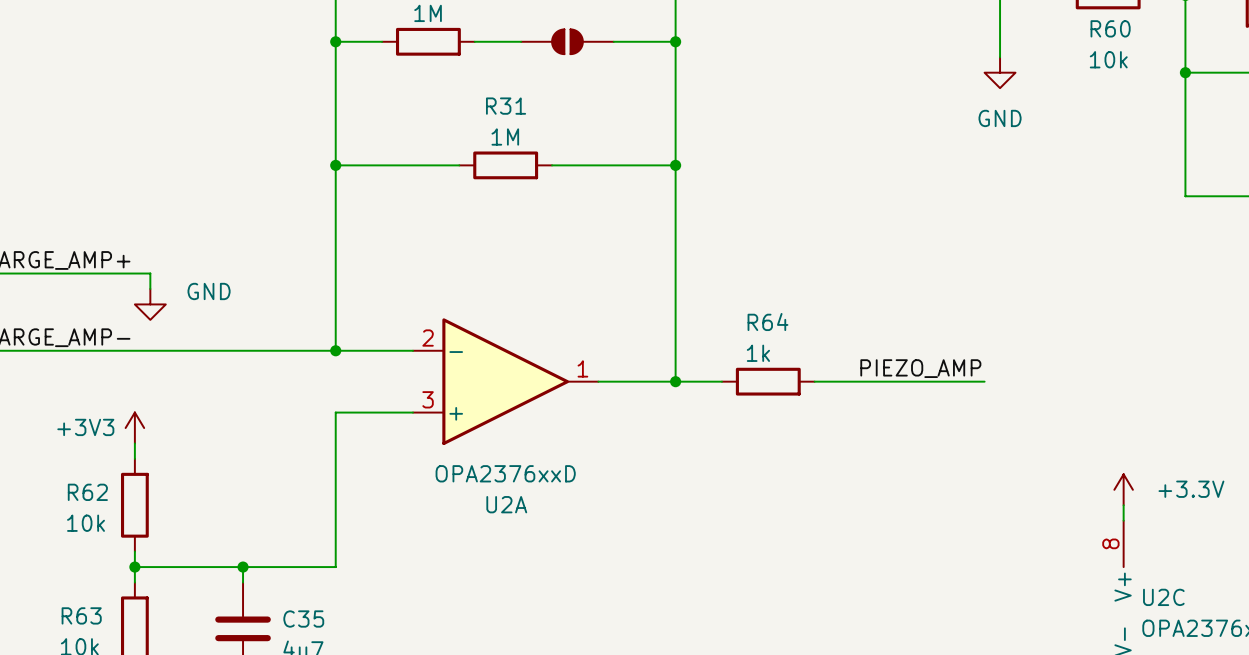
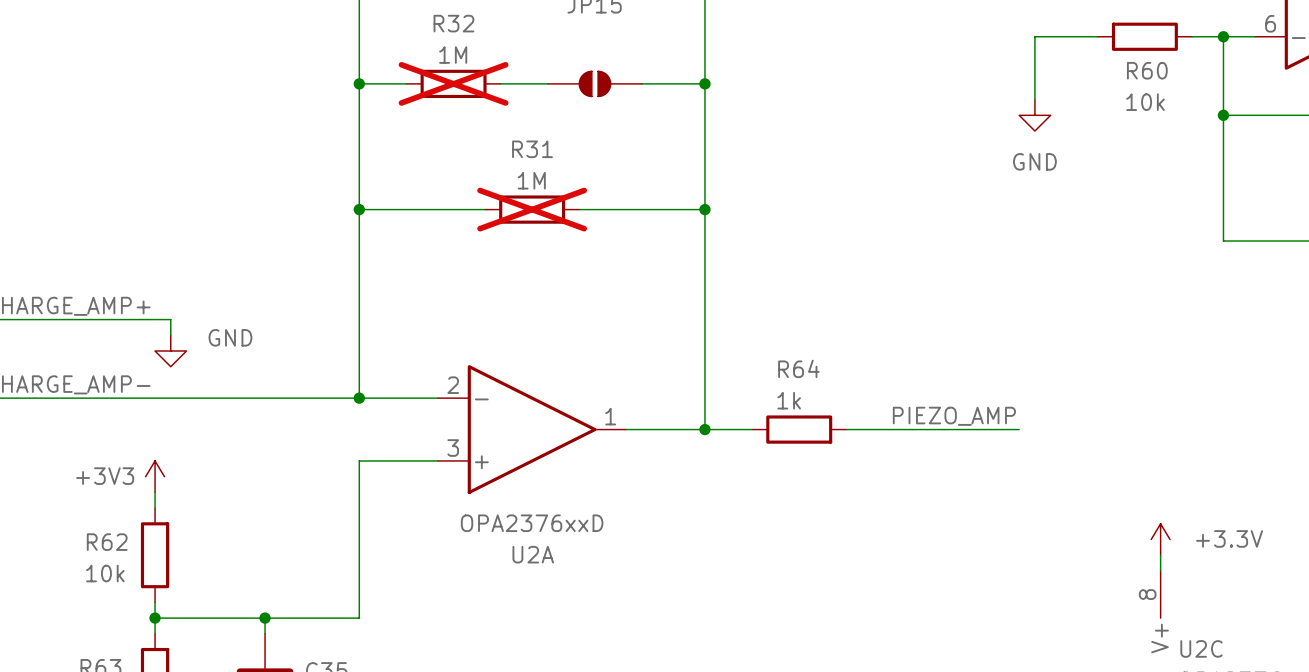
R32 do-not-place cross: none -> (453, 83)
R31 do-not-place cross: none -> (532, 209)

